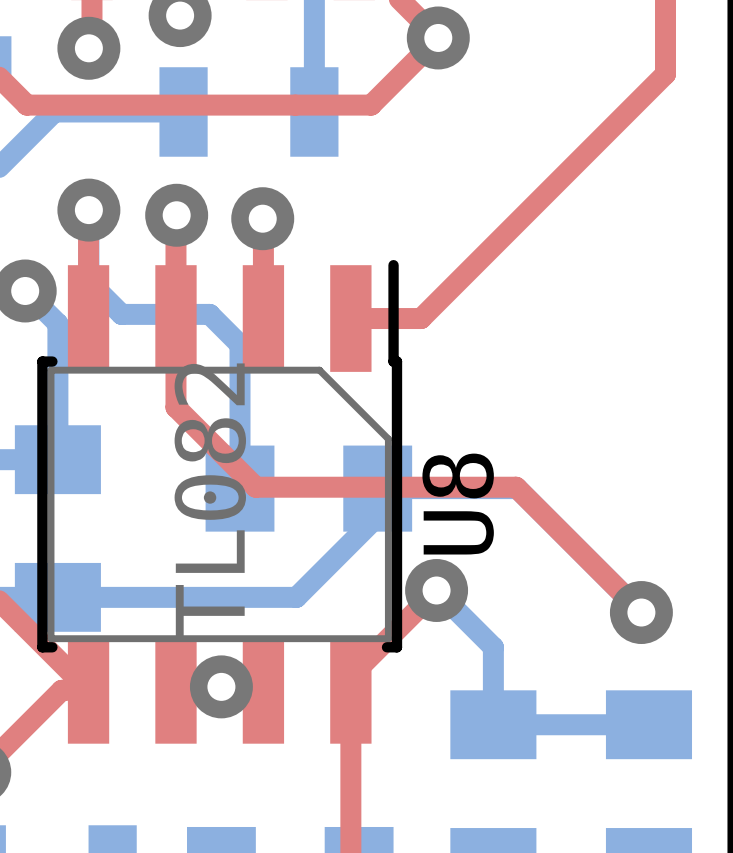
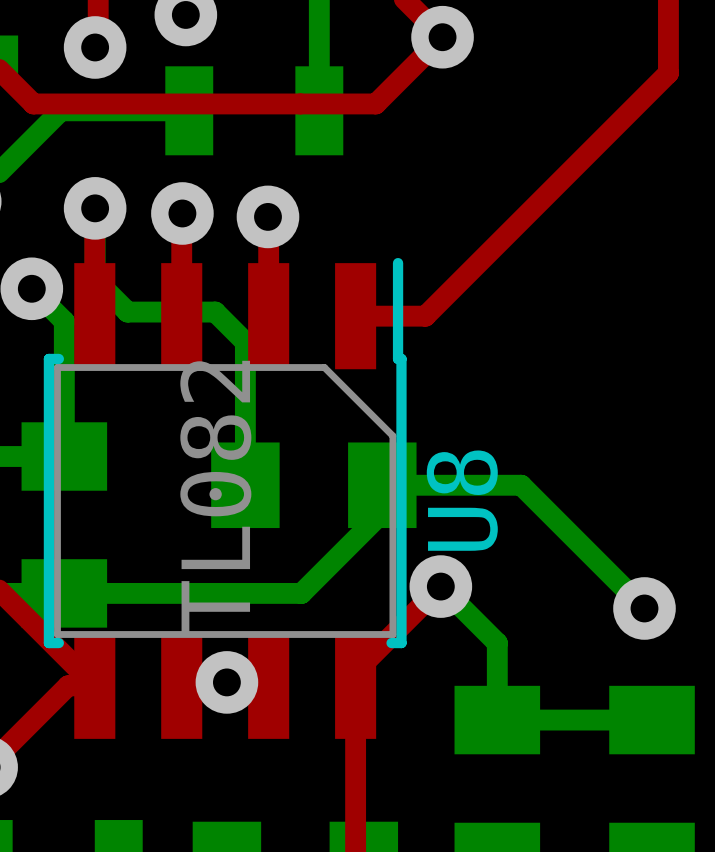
top track: (175, 318) (175, 407) (255, 487) (516, 487) (641, 612) -> none

